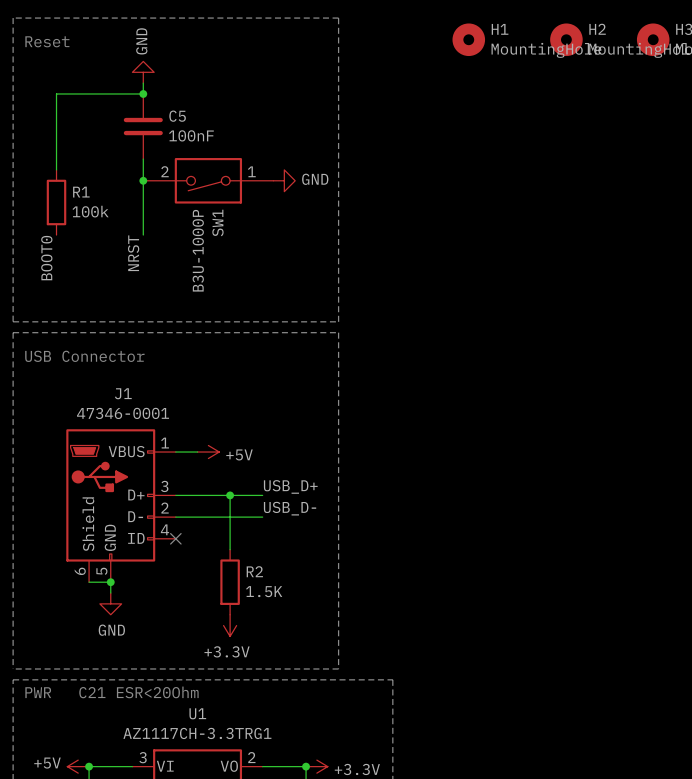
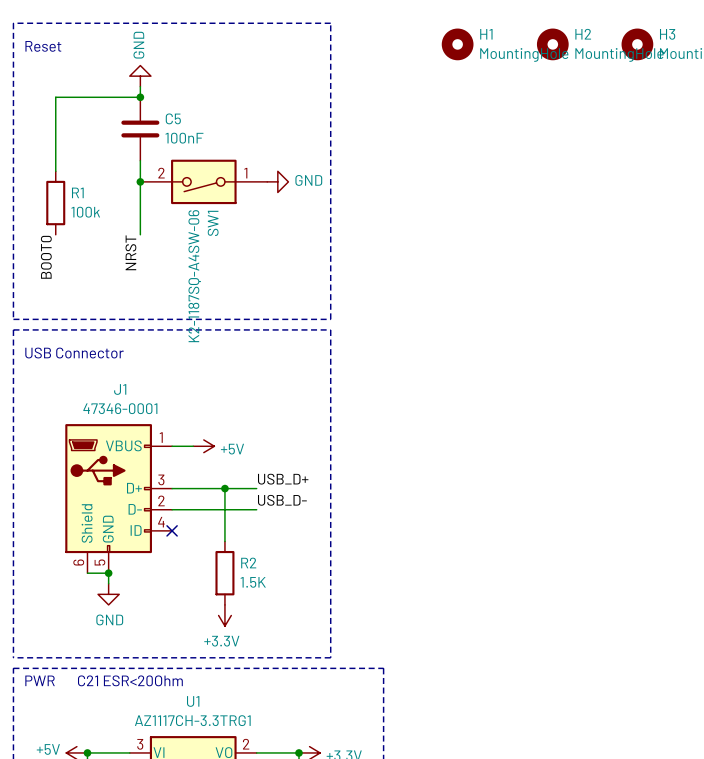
SW1 value: B3U-1000P (198, 250) -> K2-1187SQ-A4SW-06 (194, 276)

